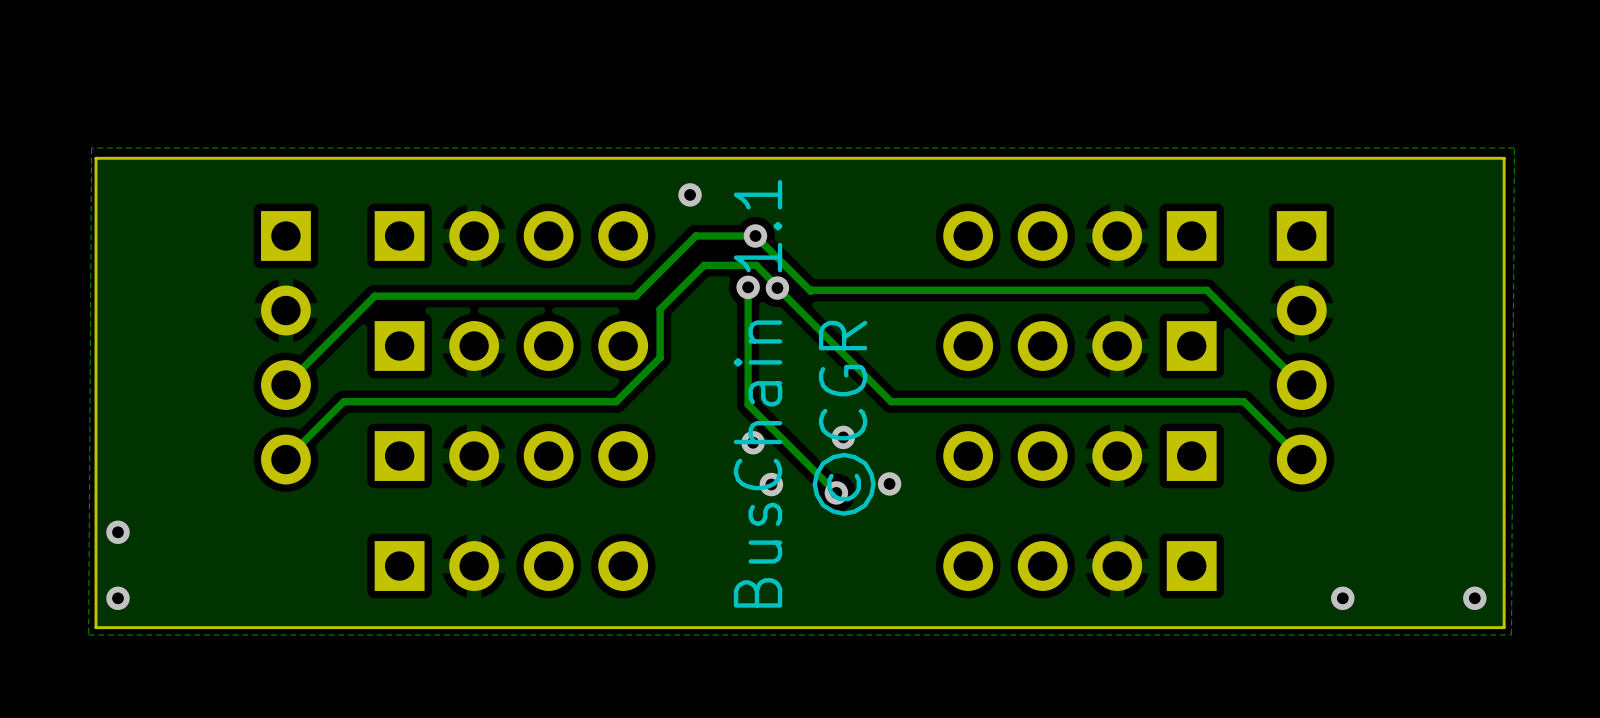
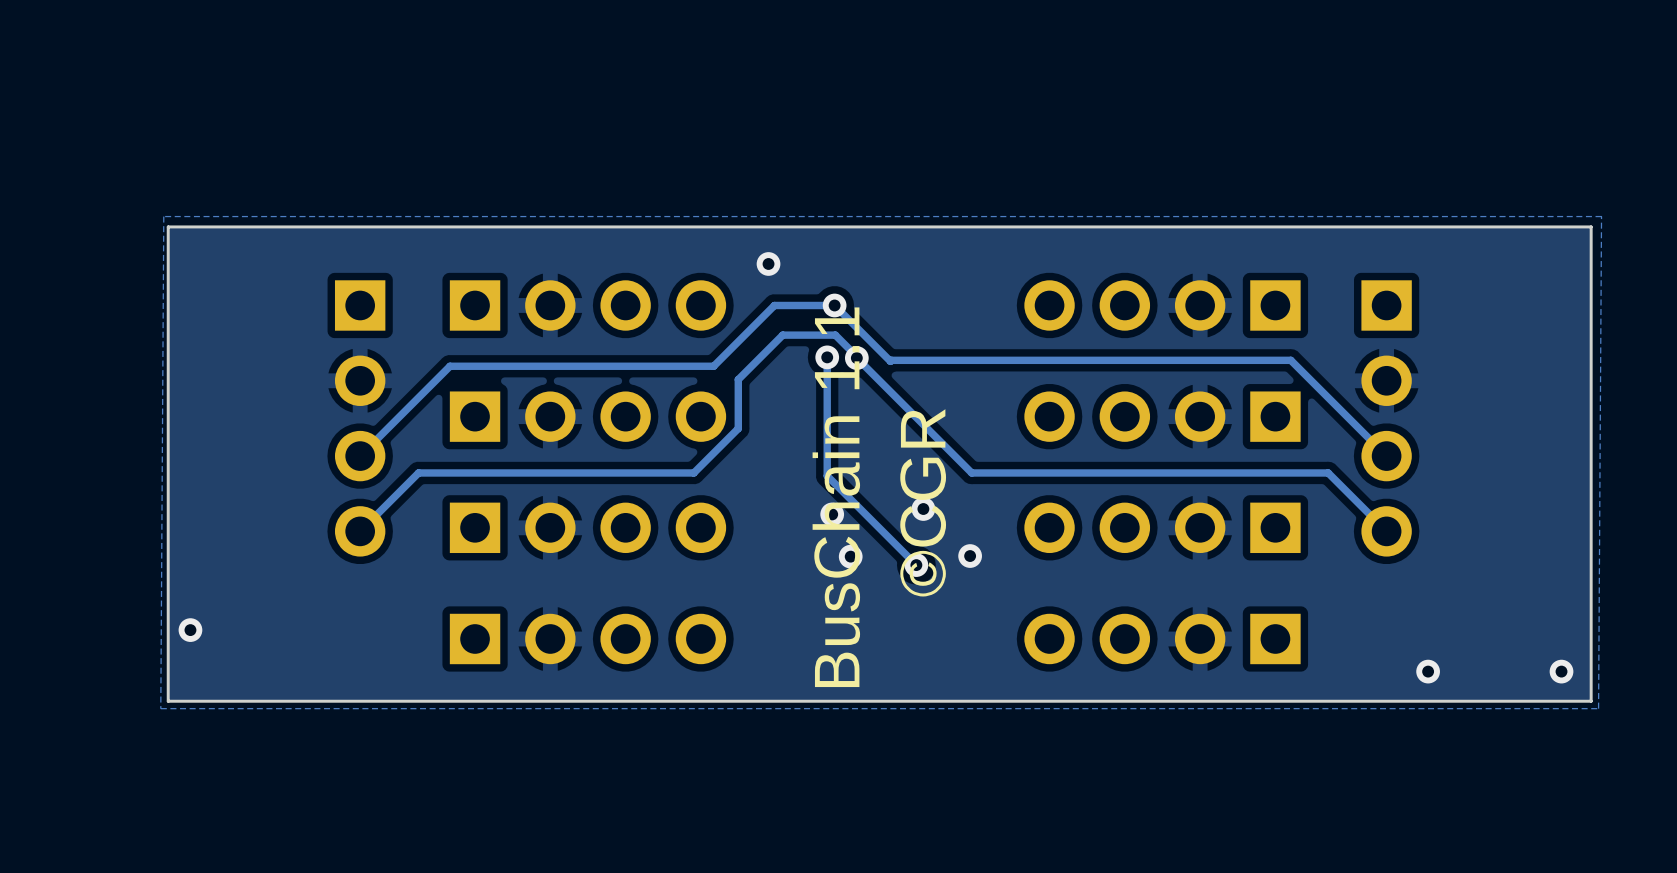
via: (117, 532) -> none
via: none -> (190, 630)
via: (117, 598) -> none

